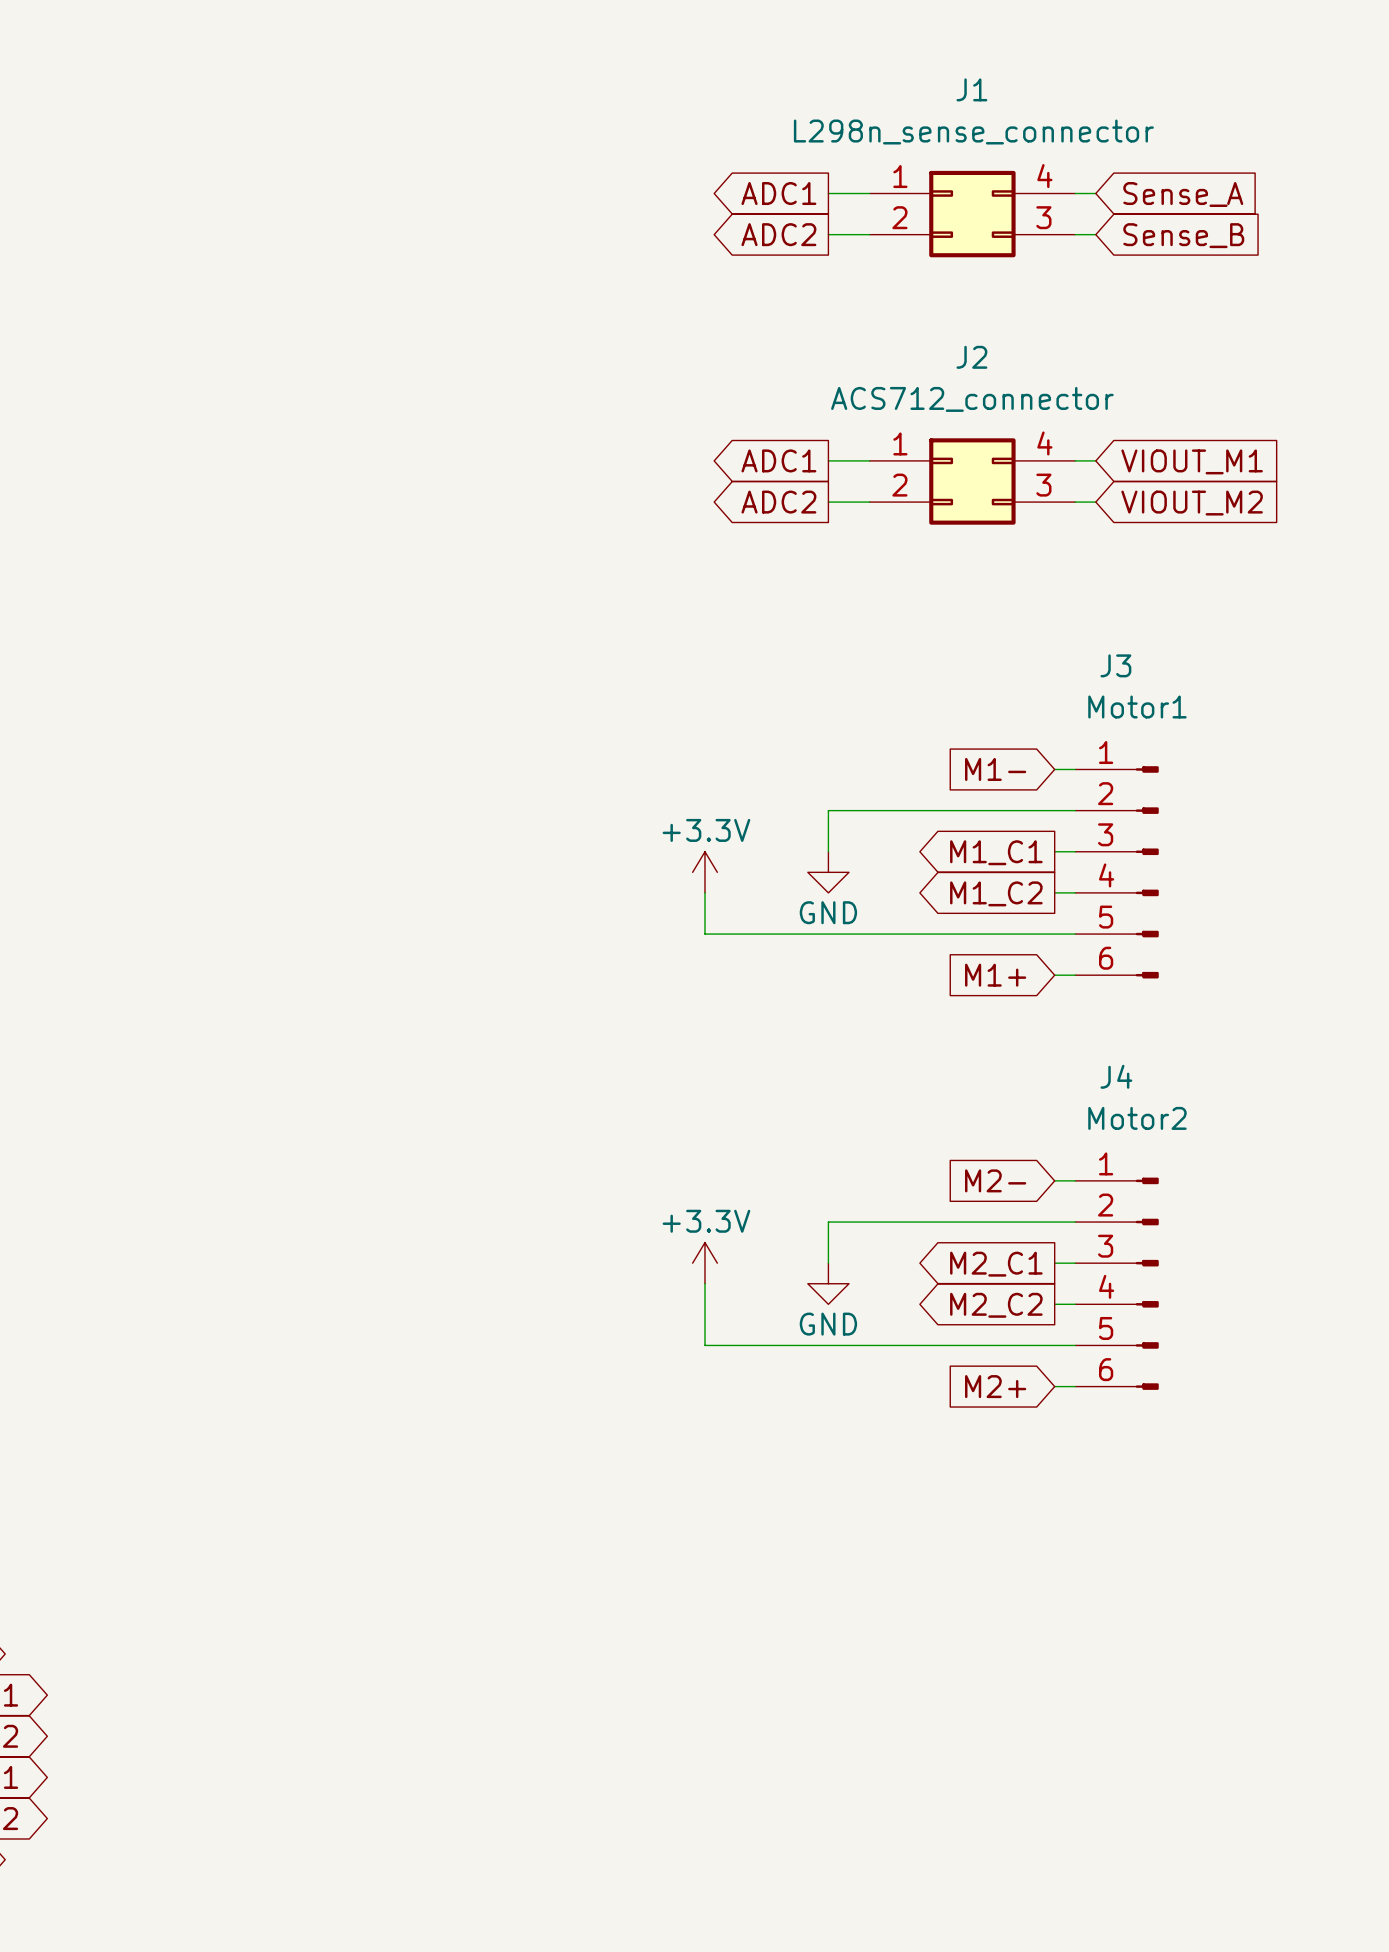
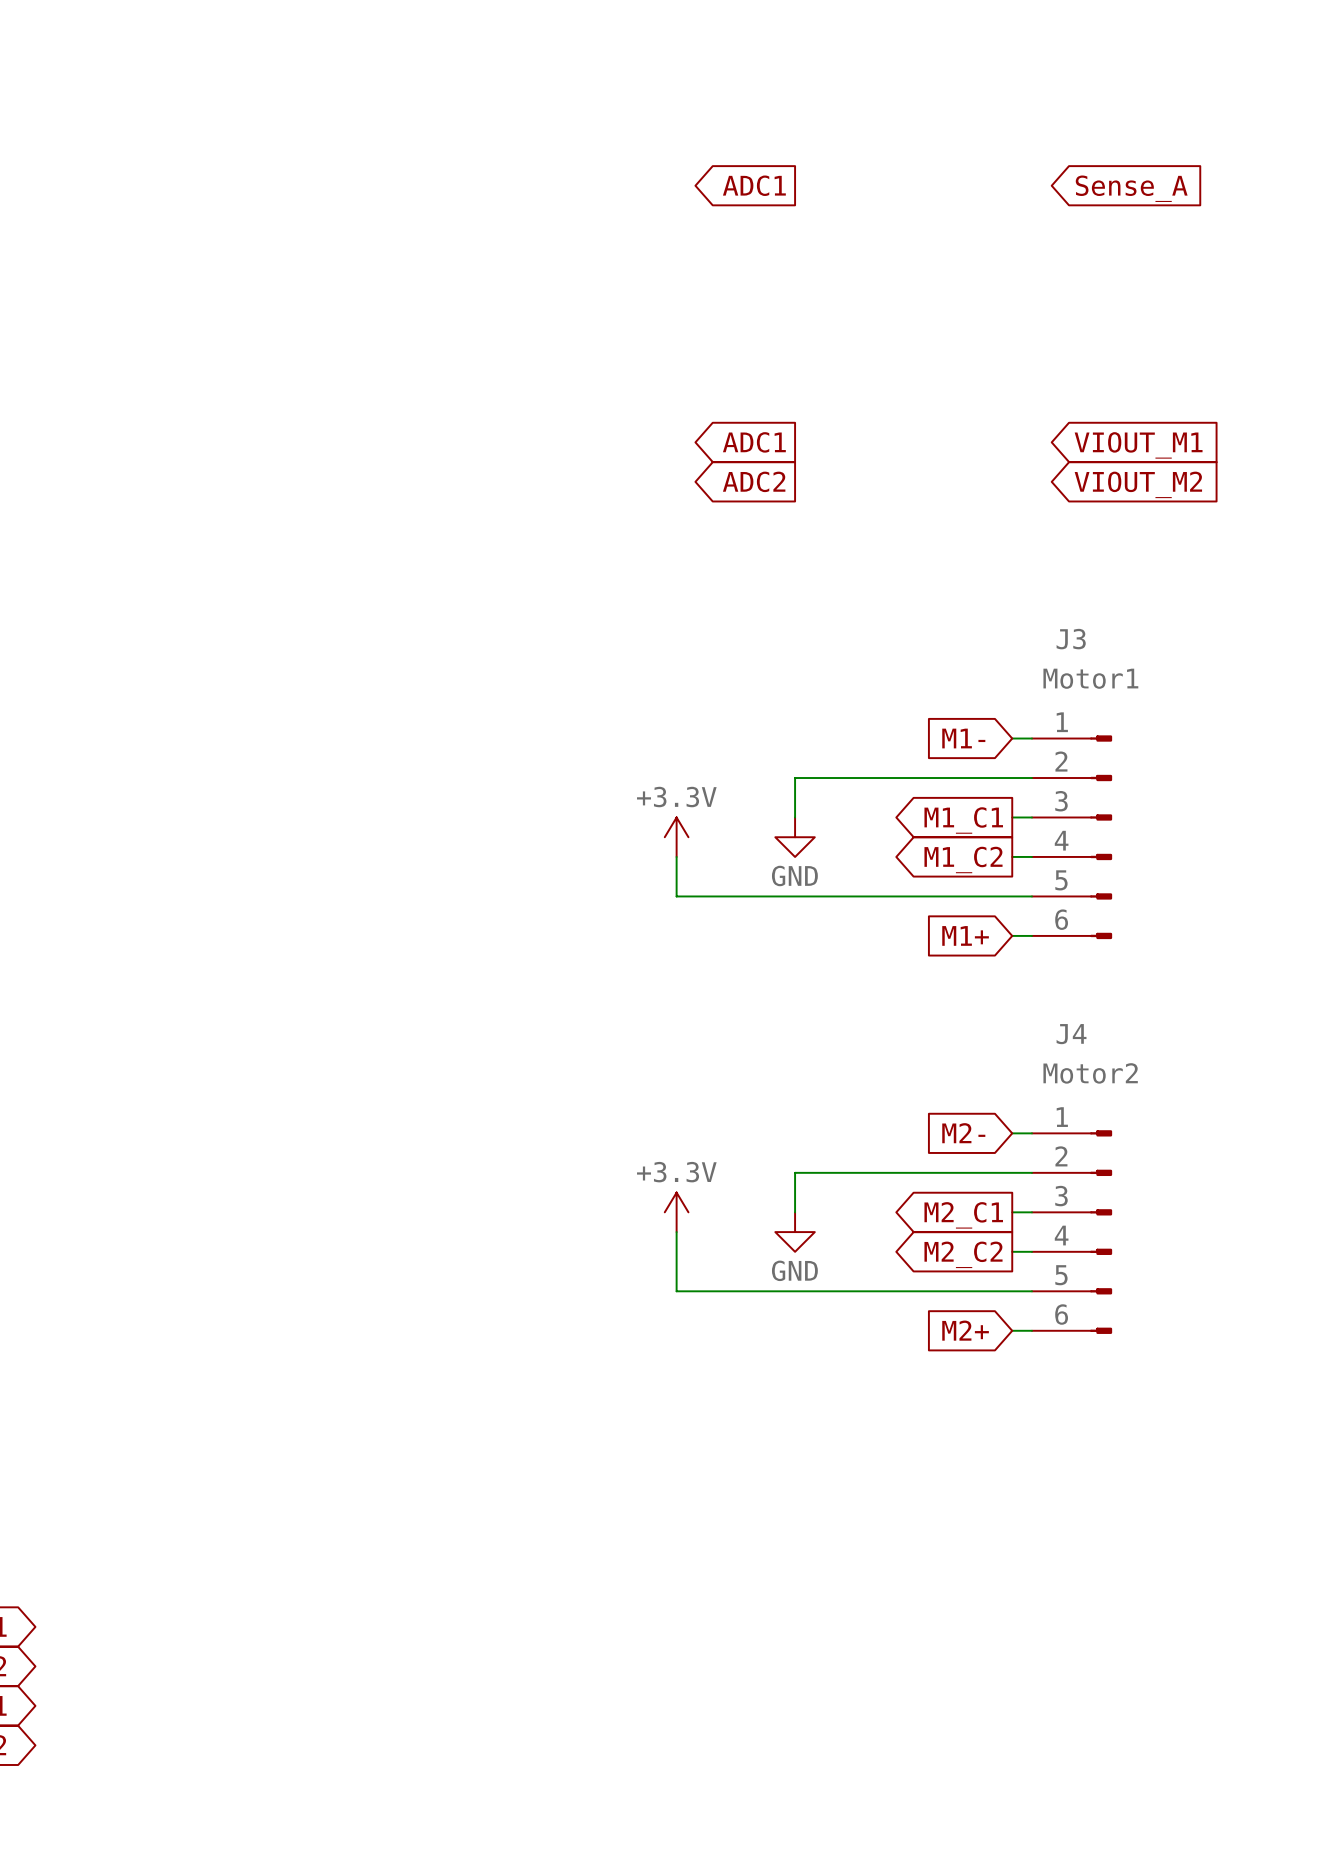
wire: (828, 193) (869, 193) -> none
wire: (1075, 193) (1095, 193) -> none
J1: L298n_sense_connector (972, 214) -> none
global label: ADC2 (778, 234) -> none
wire: (828, 234) (869, 234) -> none
wire: (1075, 234) (1095, 234) -> none
global label: Sense_B (1183, 235) -> none
wire: (828, 460) (869, 460) -> none
wire: (1075, 460) (1095, 460) -> none
J2: ACS712_connector (972, 481) -> none
wire: (828, 502) (869, 502) -> none
wire: (1075, 502) (1095, 502) -> none

